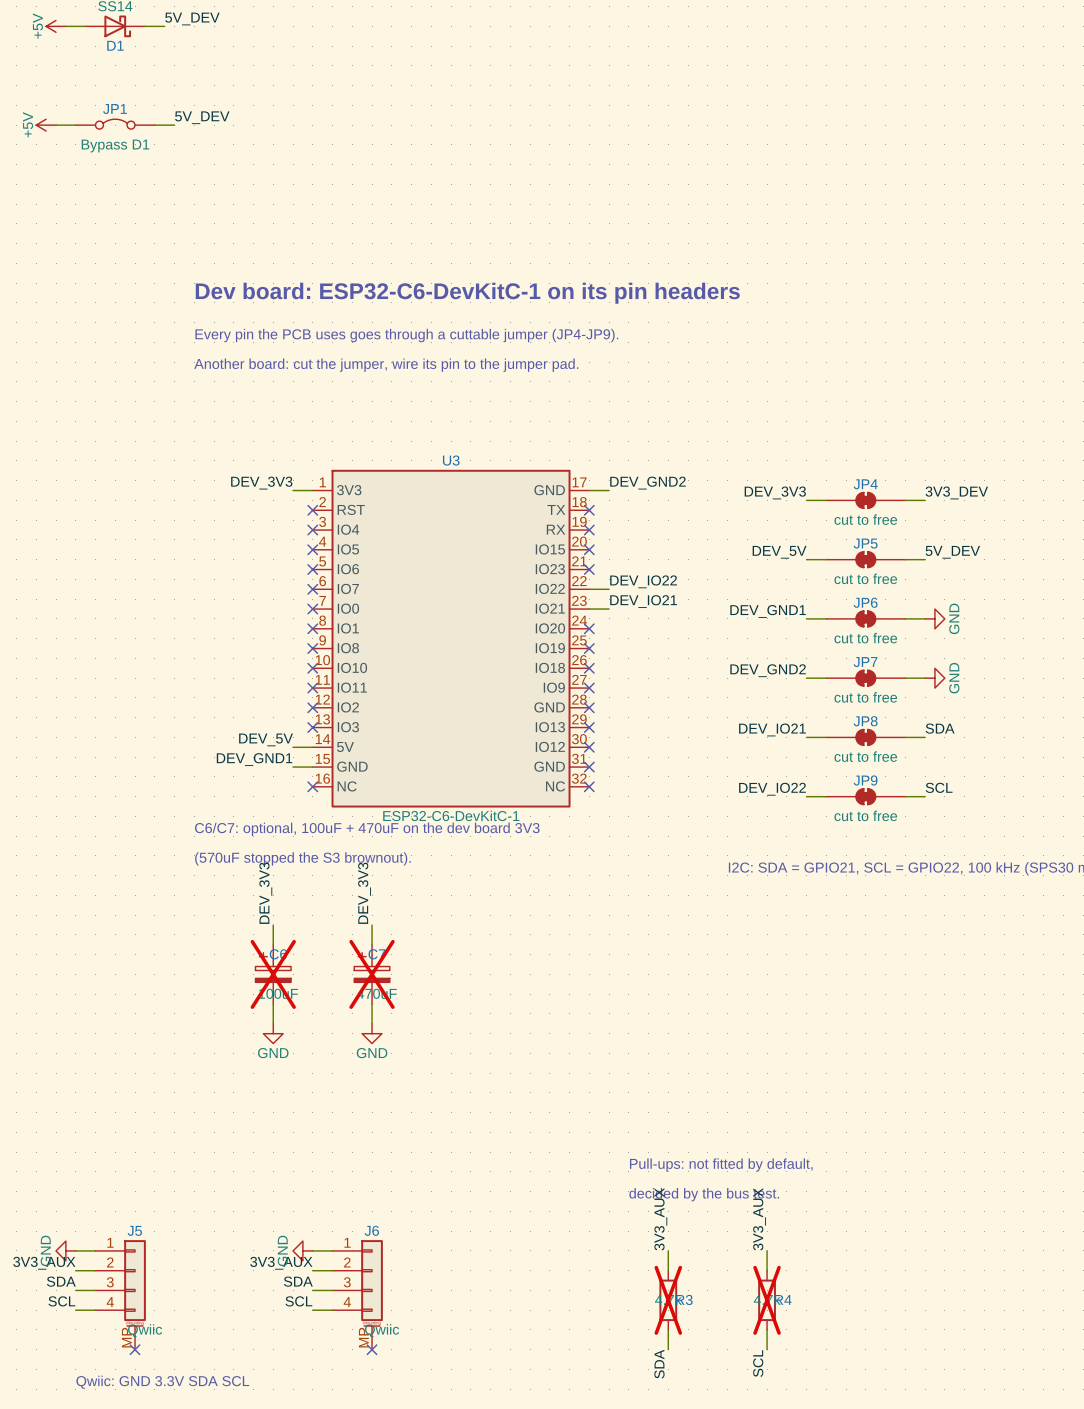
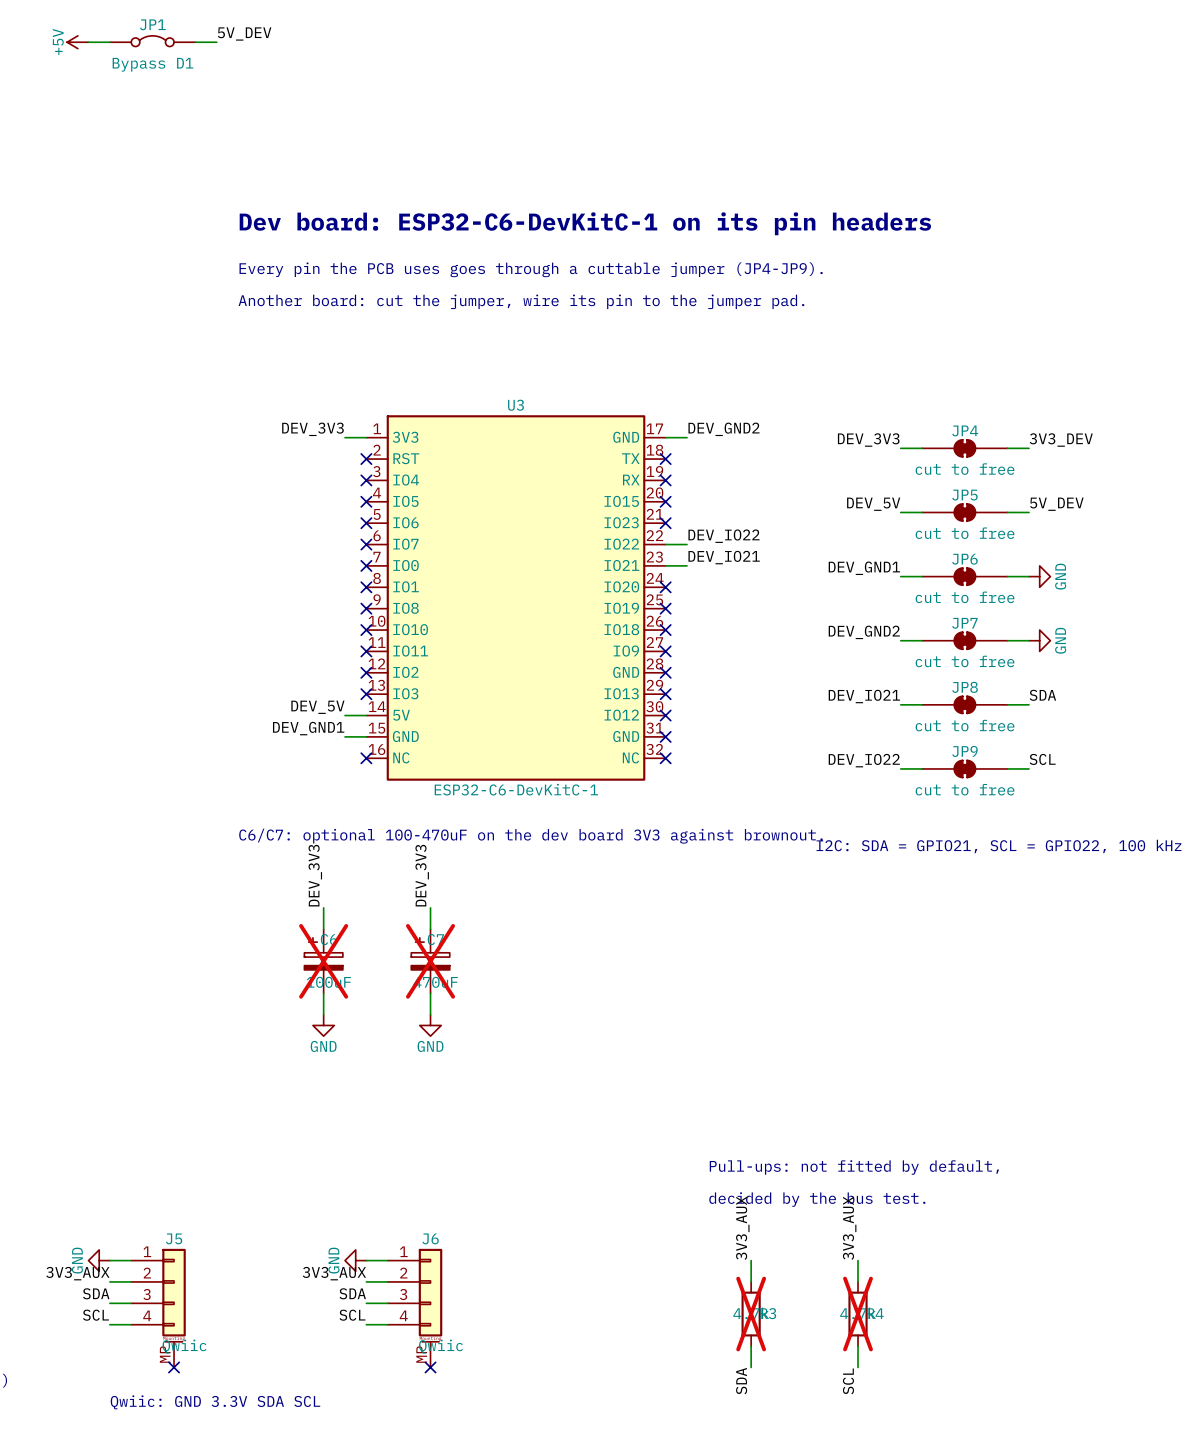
text: C6/C7: optional, 100uF + 470uF on the dev board 3V3 (367, 829) -> none
text: (570uF stopped the S3 brownout). (302, 858) -> C6/C7: optional 100-470uF on the dev board 3V3 against brownout. (530, 836)

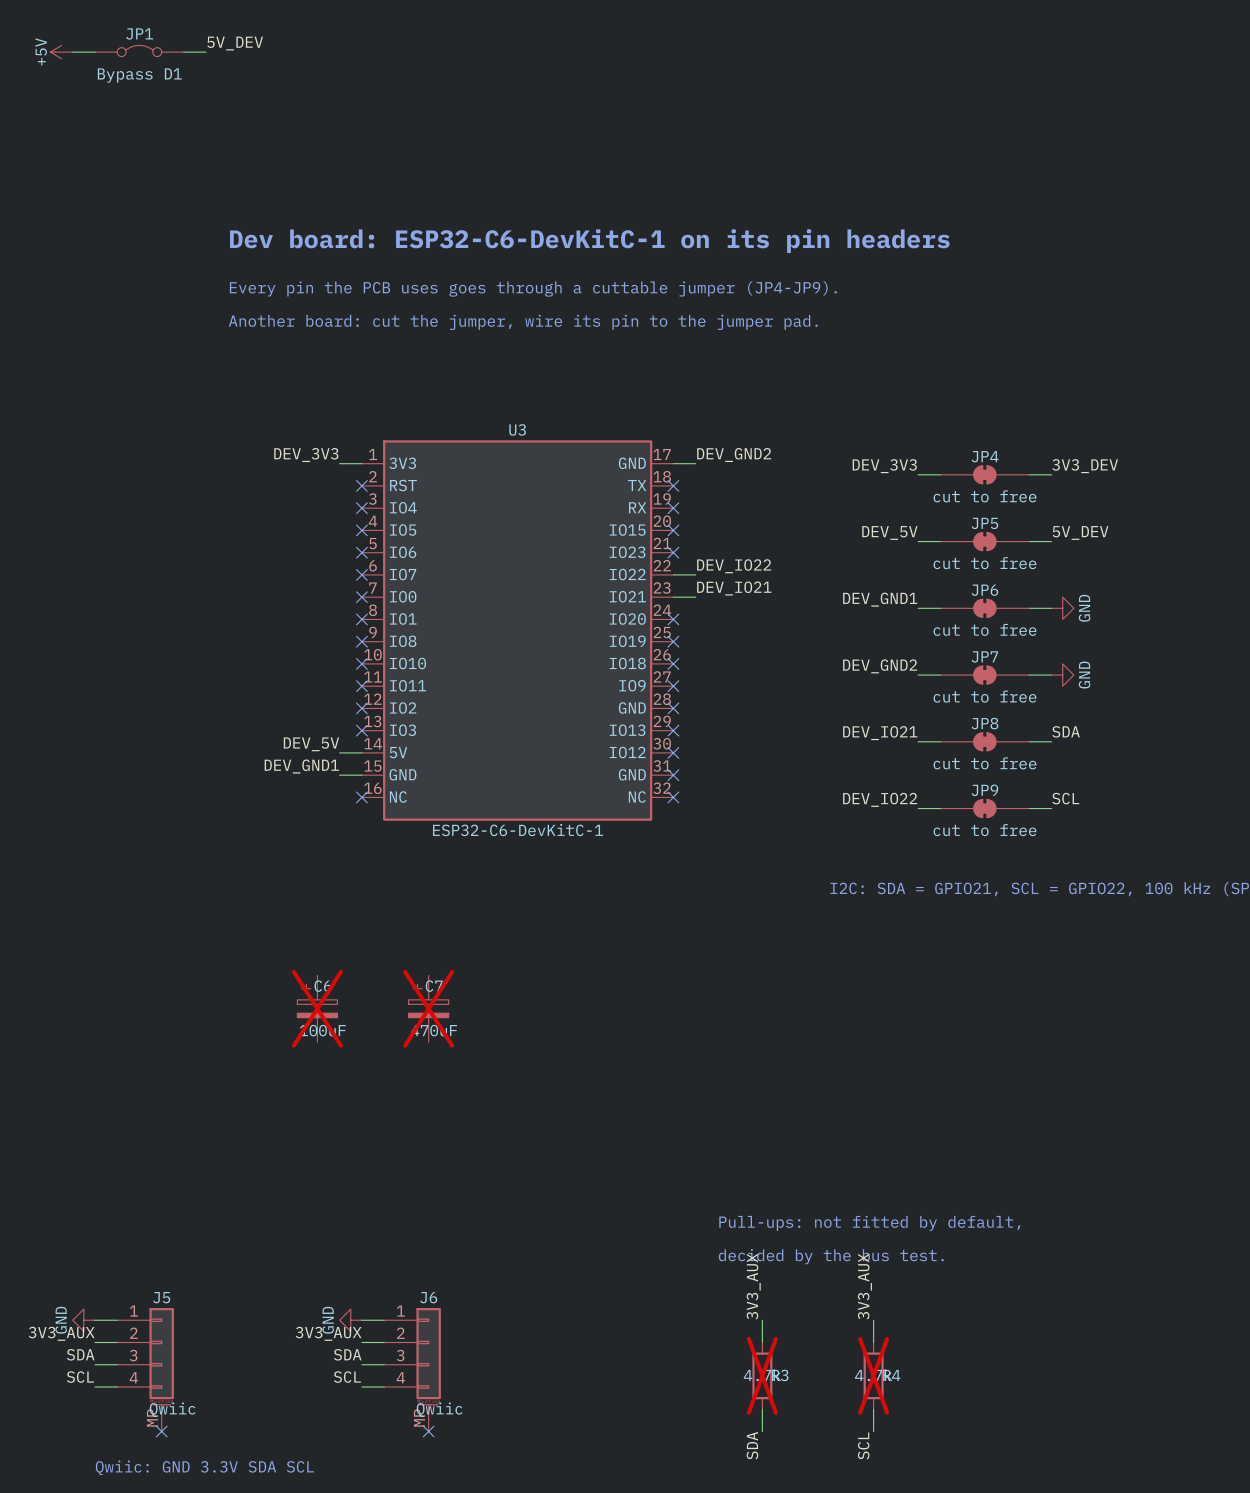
text: C6/C7: optional 100-470uF on the dev board 3V3 against brownout. (530, 836) -> none
label: DEV_3V3 (315, 875) -> none
label: DEV_3V3 (422, 875) -> none
wire: (323, 907) (323, 929) -> none
wire: (430, 907) (430, 929) -> none
wire: (323, 993) (323, 1014) -> none
wire: (430, 993) (430, 1014) -> none
power symbol: GND (323, 1025) -> none
power symbol: GND (430, 1025) -> none

